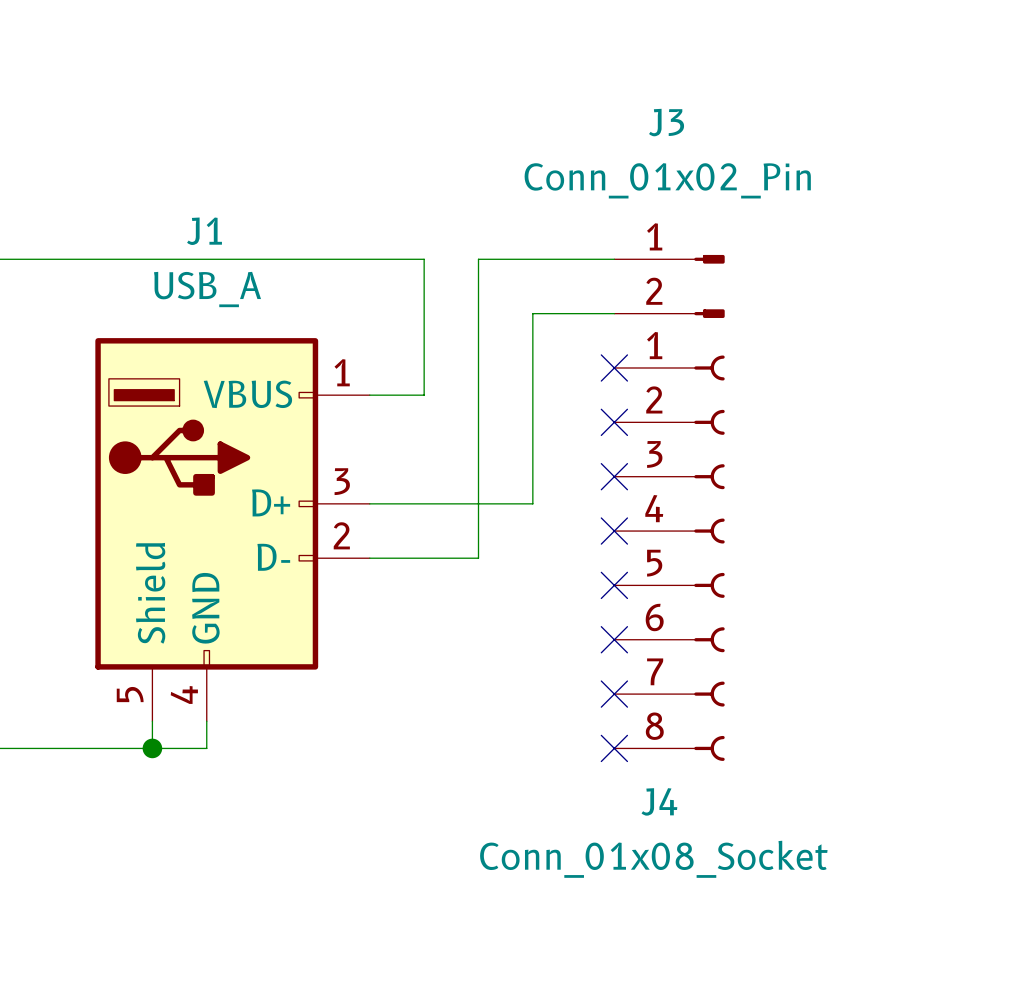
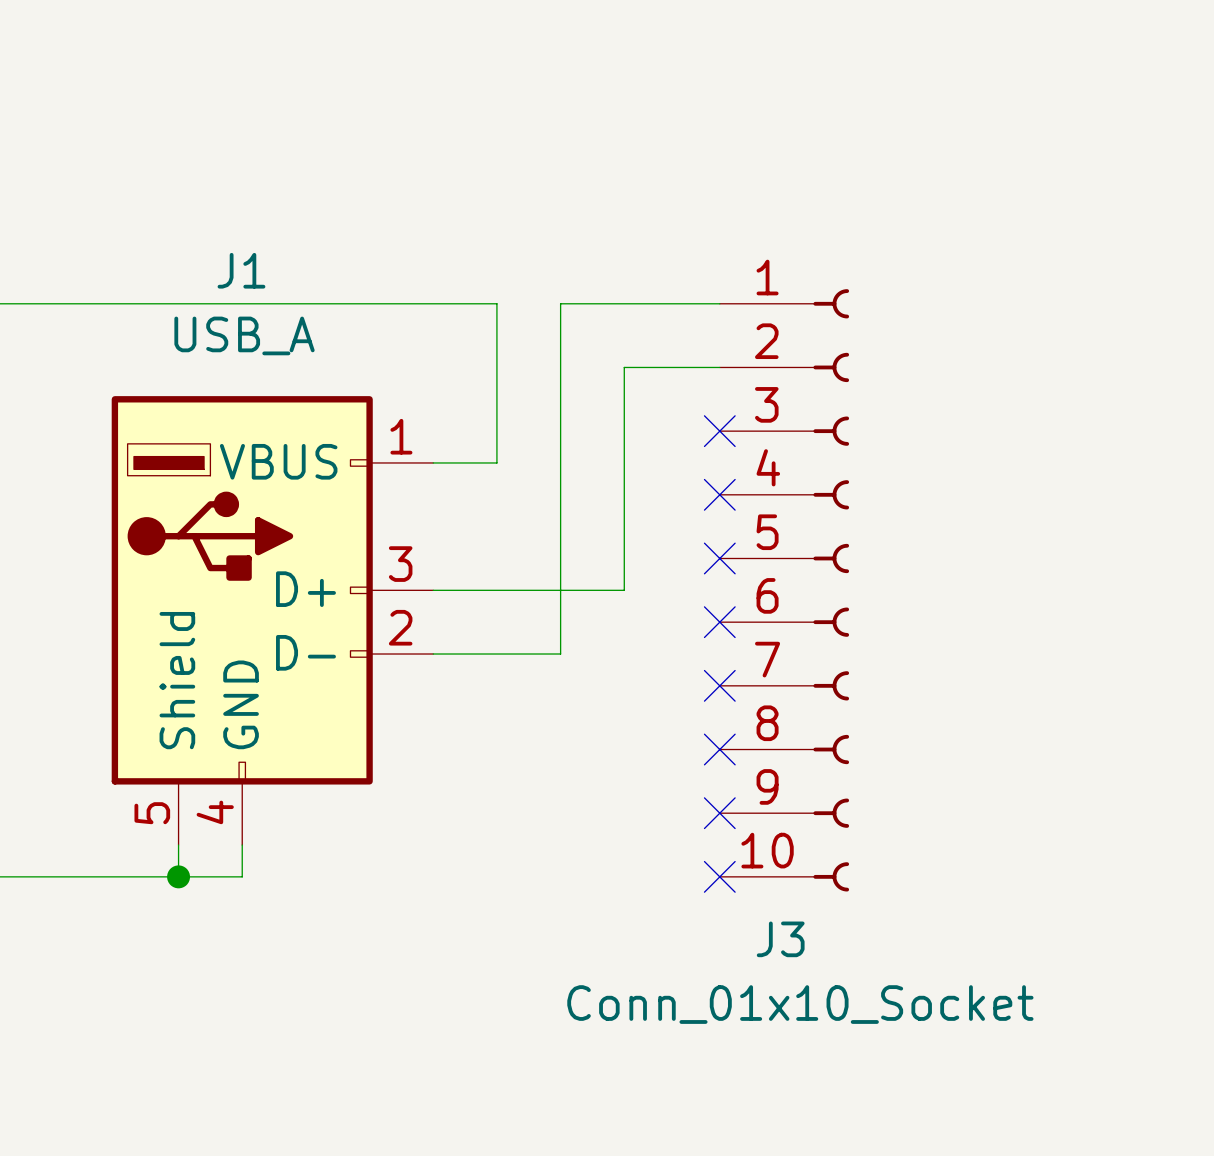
J3 name position: J3 (666, 122) -> J3 (780, 939)
J3 value: Conn_01x02_Pin (667, 180) -> Conn_01x10_Socket (800, 1004)
J3 symbol: [614, 254, 725, 318] -> [719, 289, 850, 892]
J4: Conn_01x08_Socket (669, 558) -> none

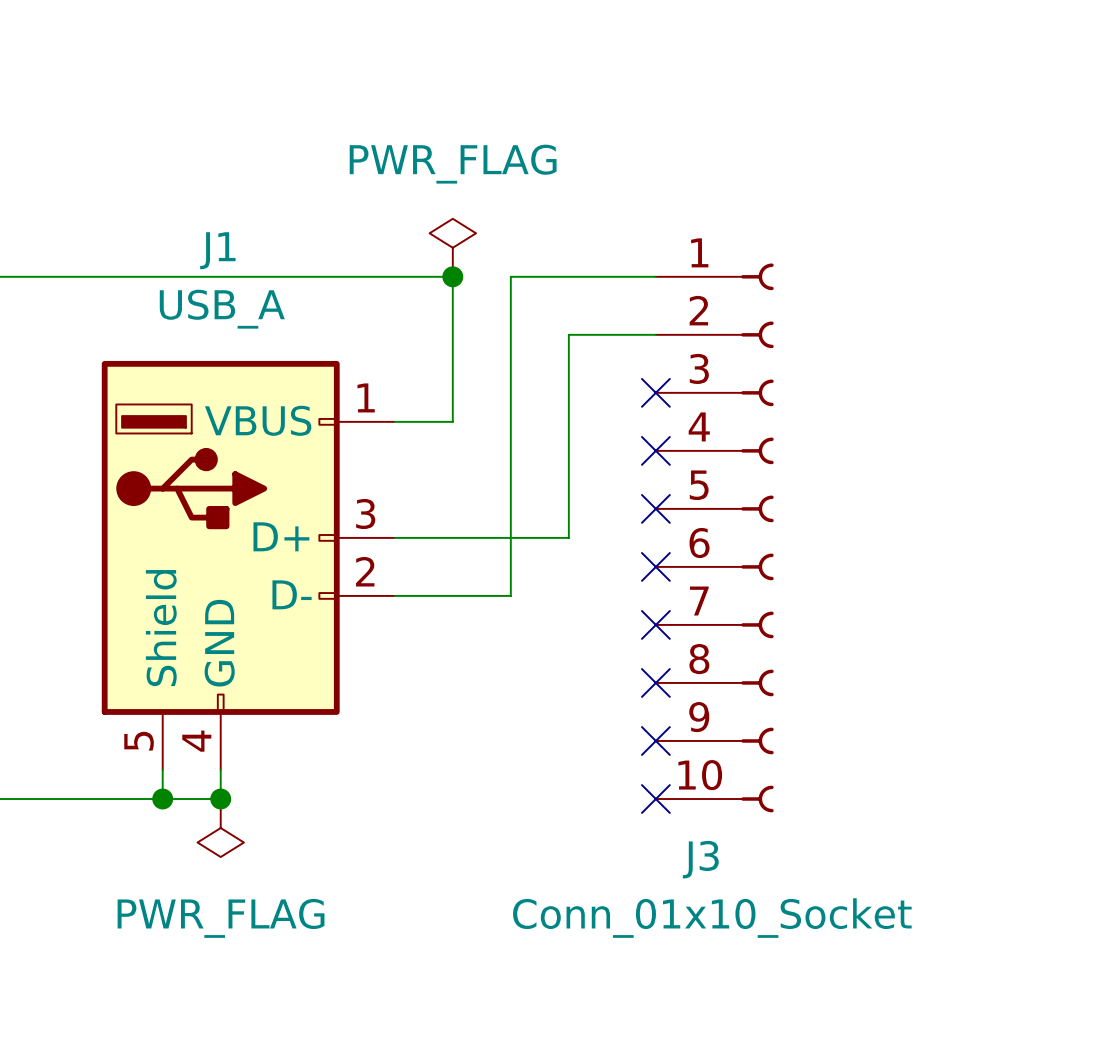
power symbol: none -> PWR_FLAG (452, 247)
junction: none -> (452, 276)
junction: none -> (220, 799)
power symbol: none -> PWR_FLAG (220, 828)

